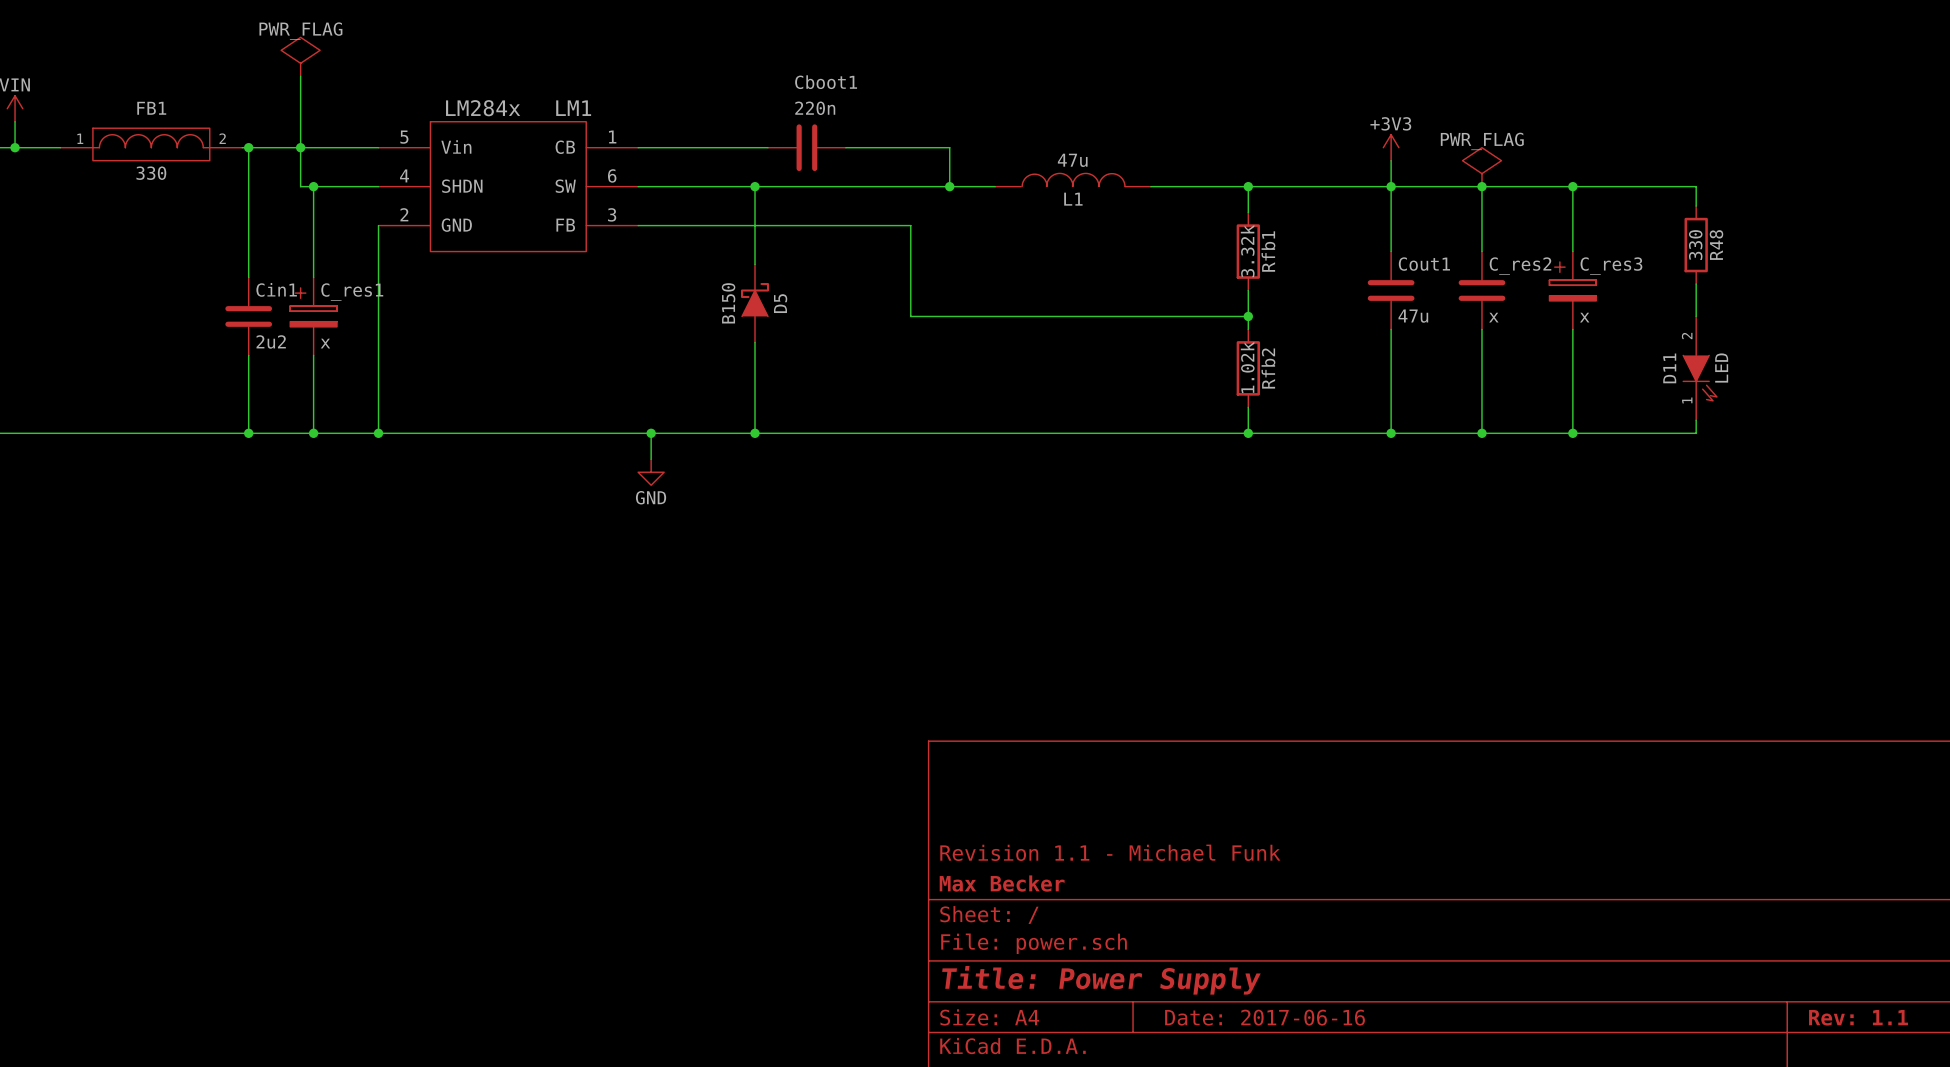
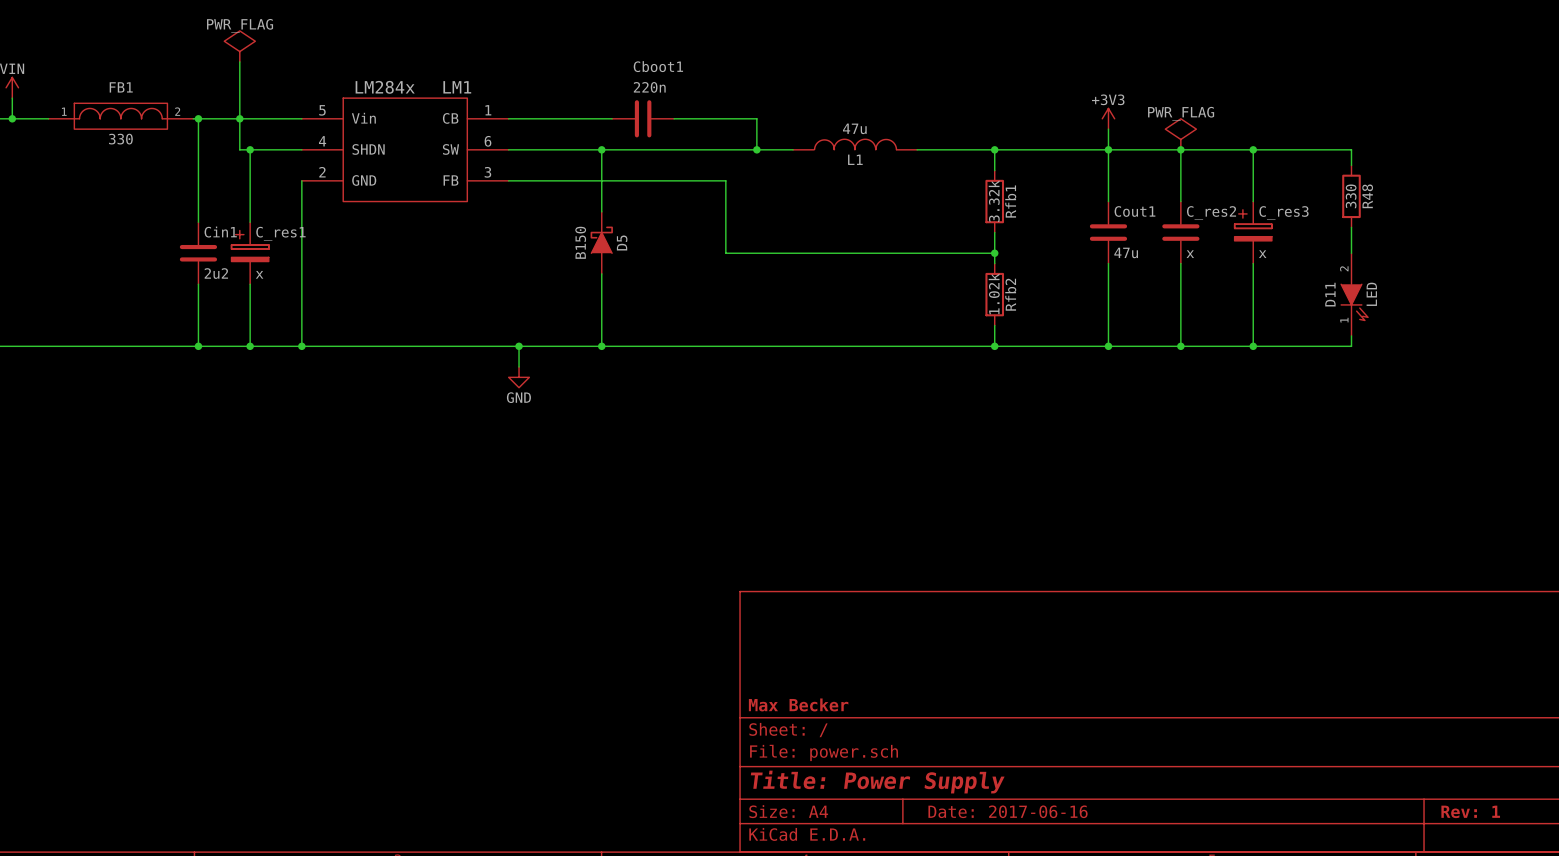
title block: Revision 1.1 - Michael Funk (1110, 852) -> none
title block: Rev: 1.1 (1858, 1017) -> Rev: 1 (1470, 811)

